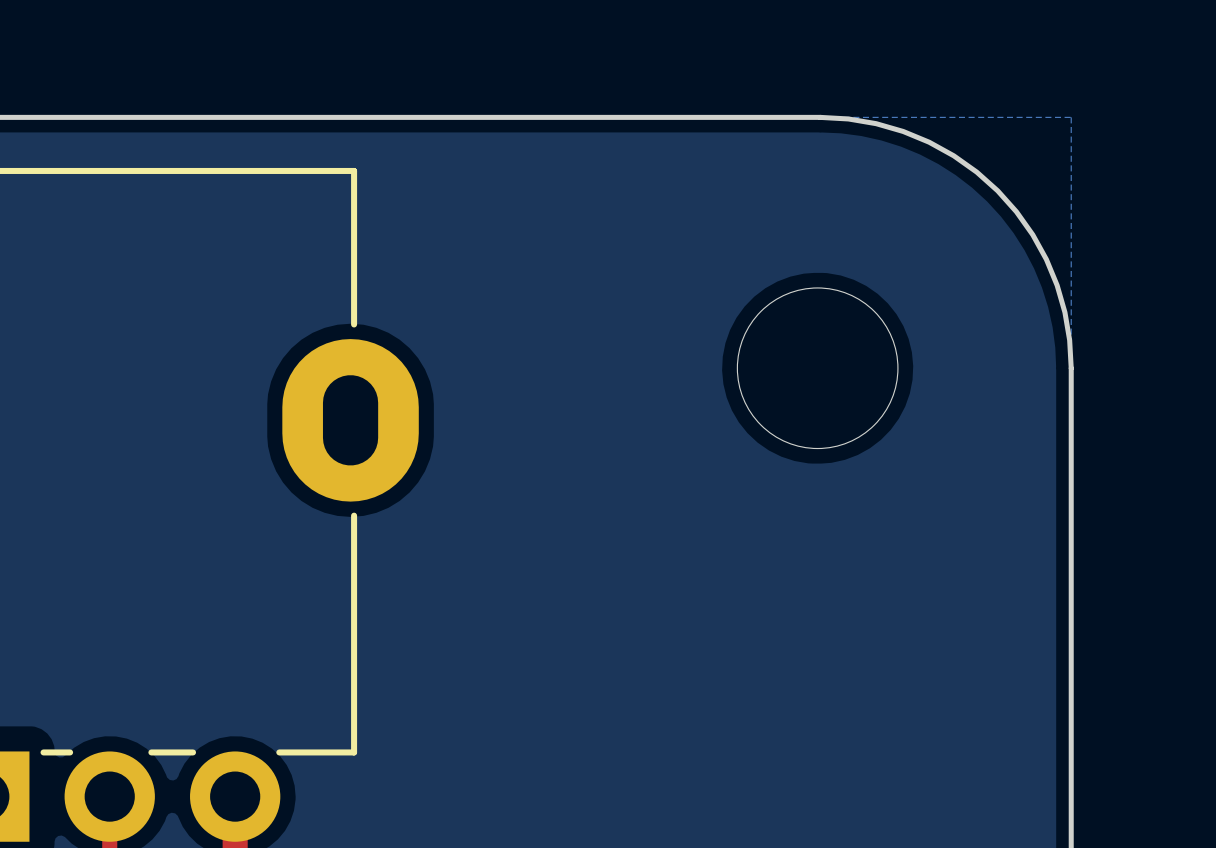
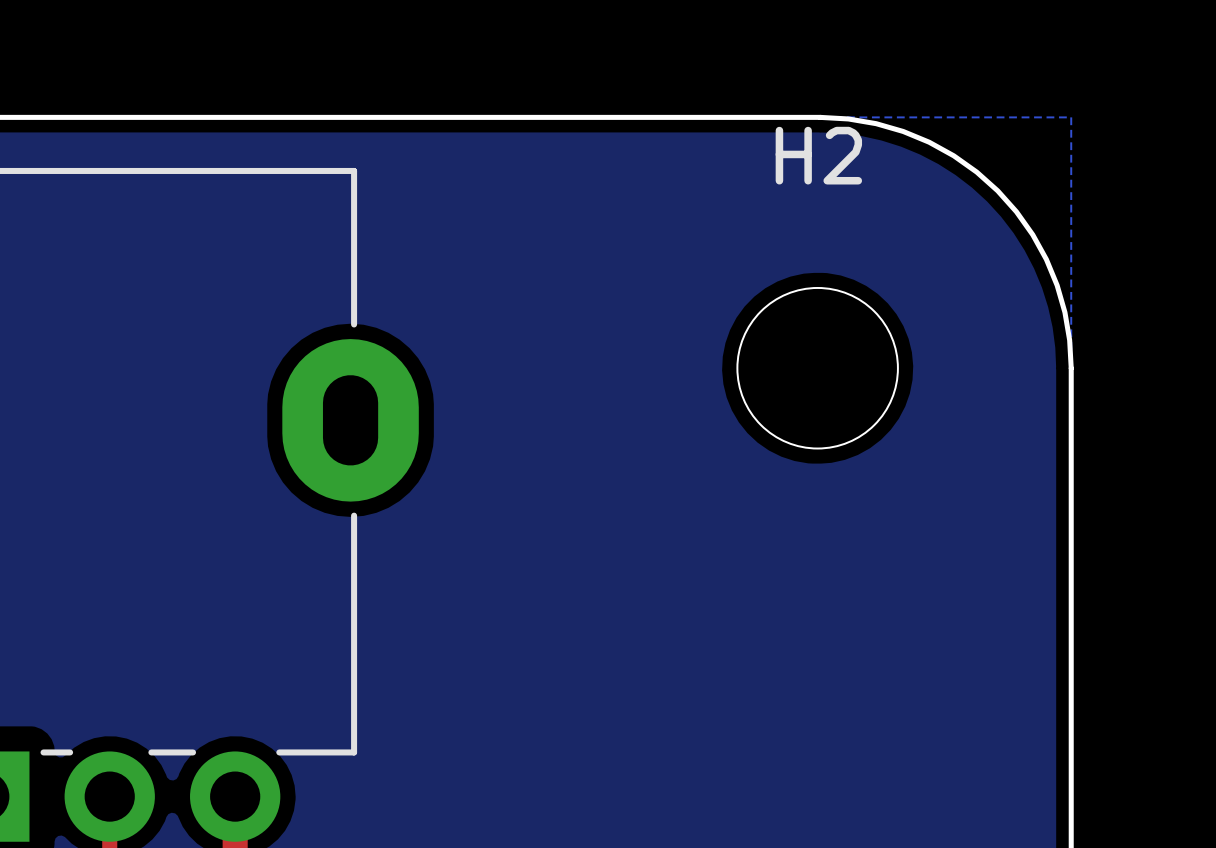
H2 name: none -> H2 (818, 155)

